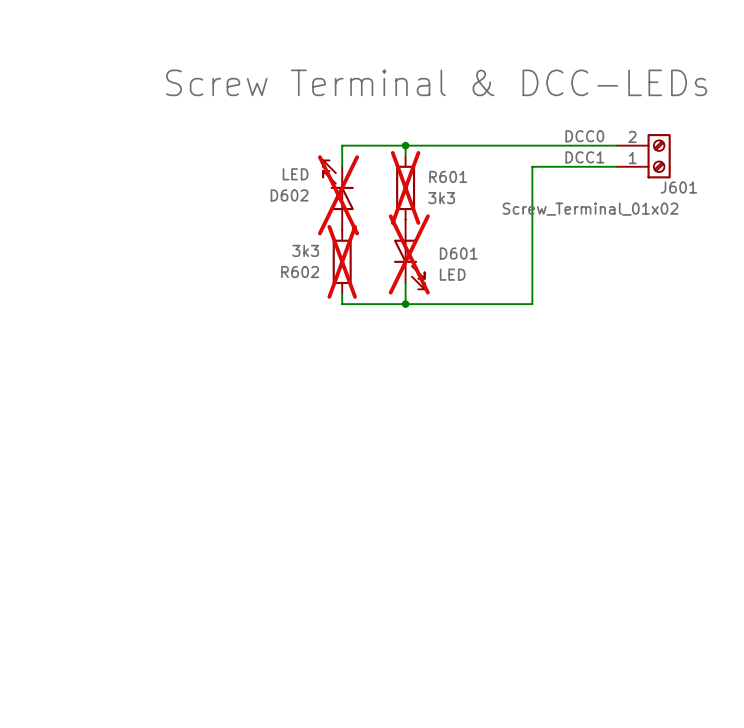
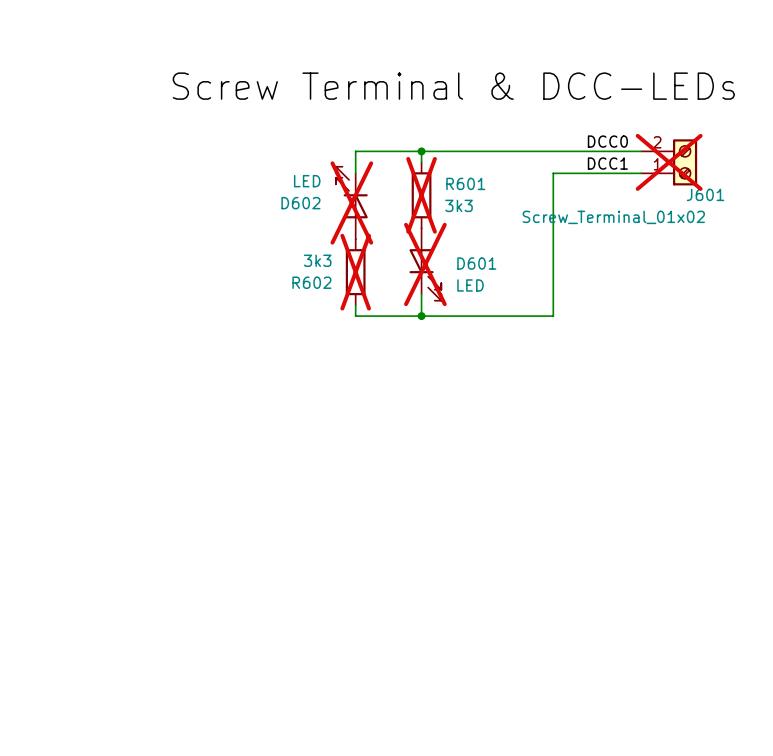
J601 do-not-place cross: none -> (669, 162)

